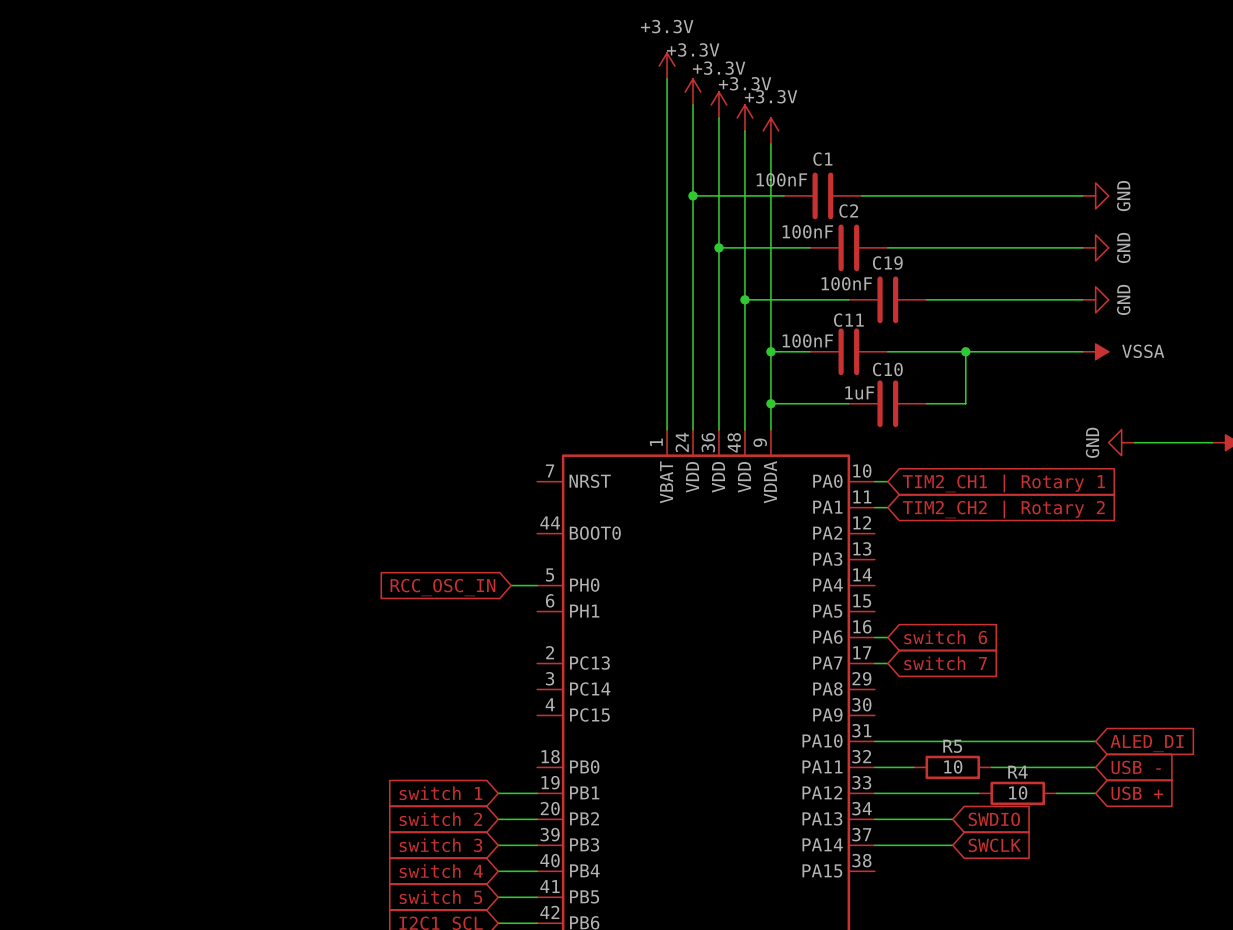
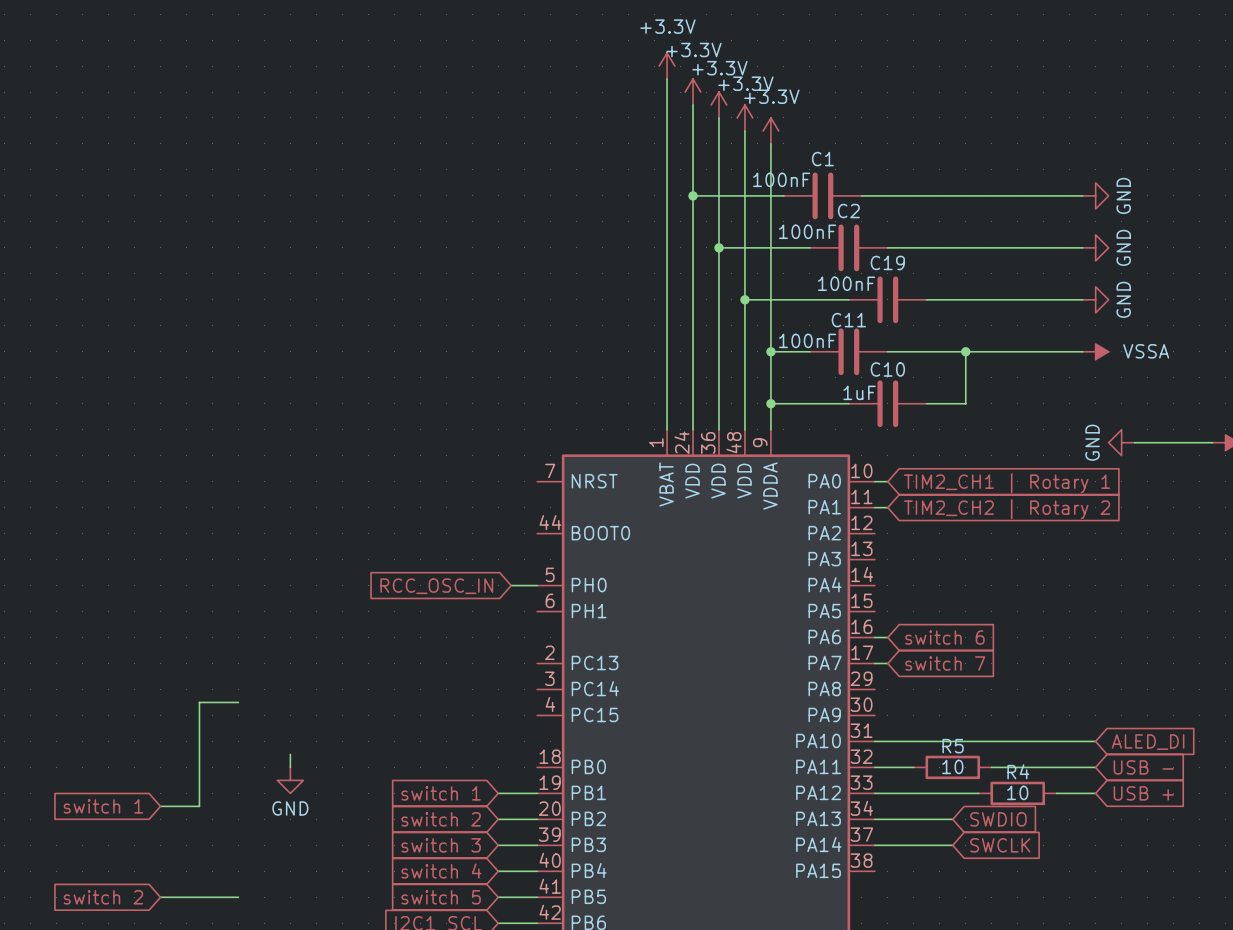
wire: none -> (238, 702) (199, 702) (199, 806) (160, 806)
wire: none -> (290, 754) (290, 767)
power symbol: none -> GND (290, 780)
global label: none -> switch 1 (103, 806)
global label: none -> switch 2 (103, 897)
wire: none -> (160, 897) (238, 897)

